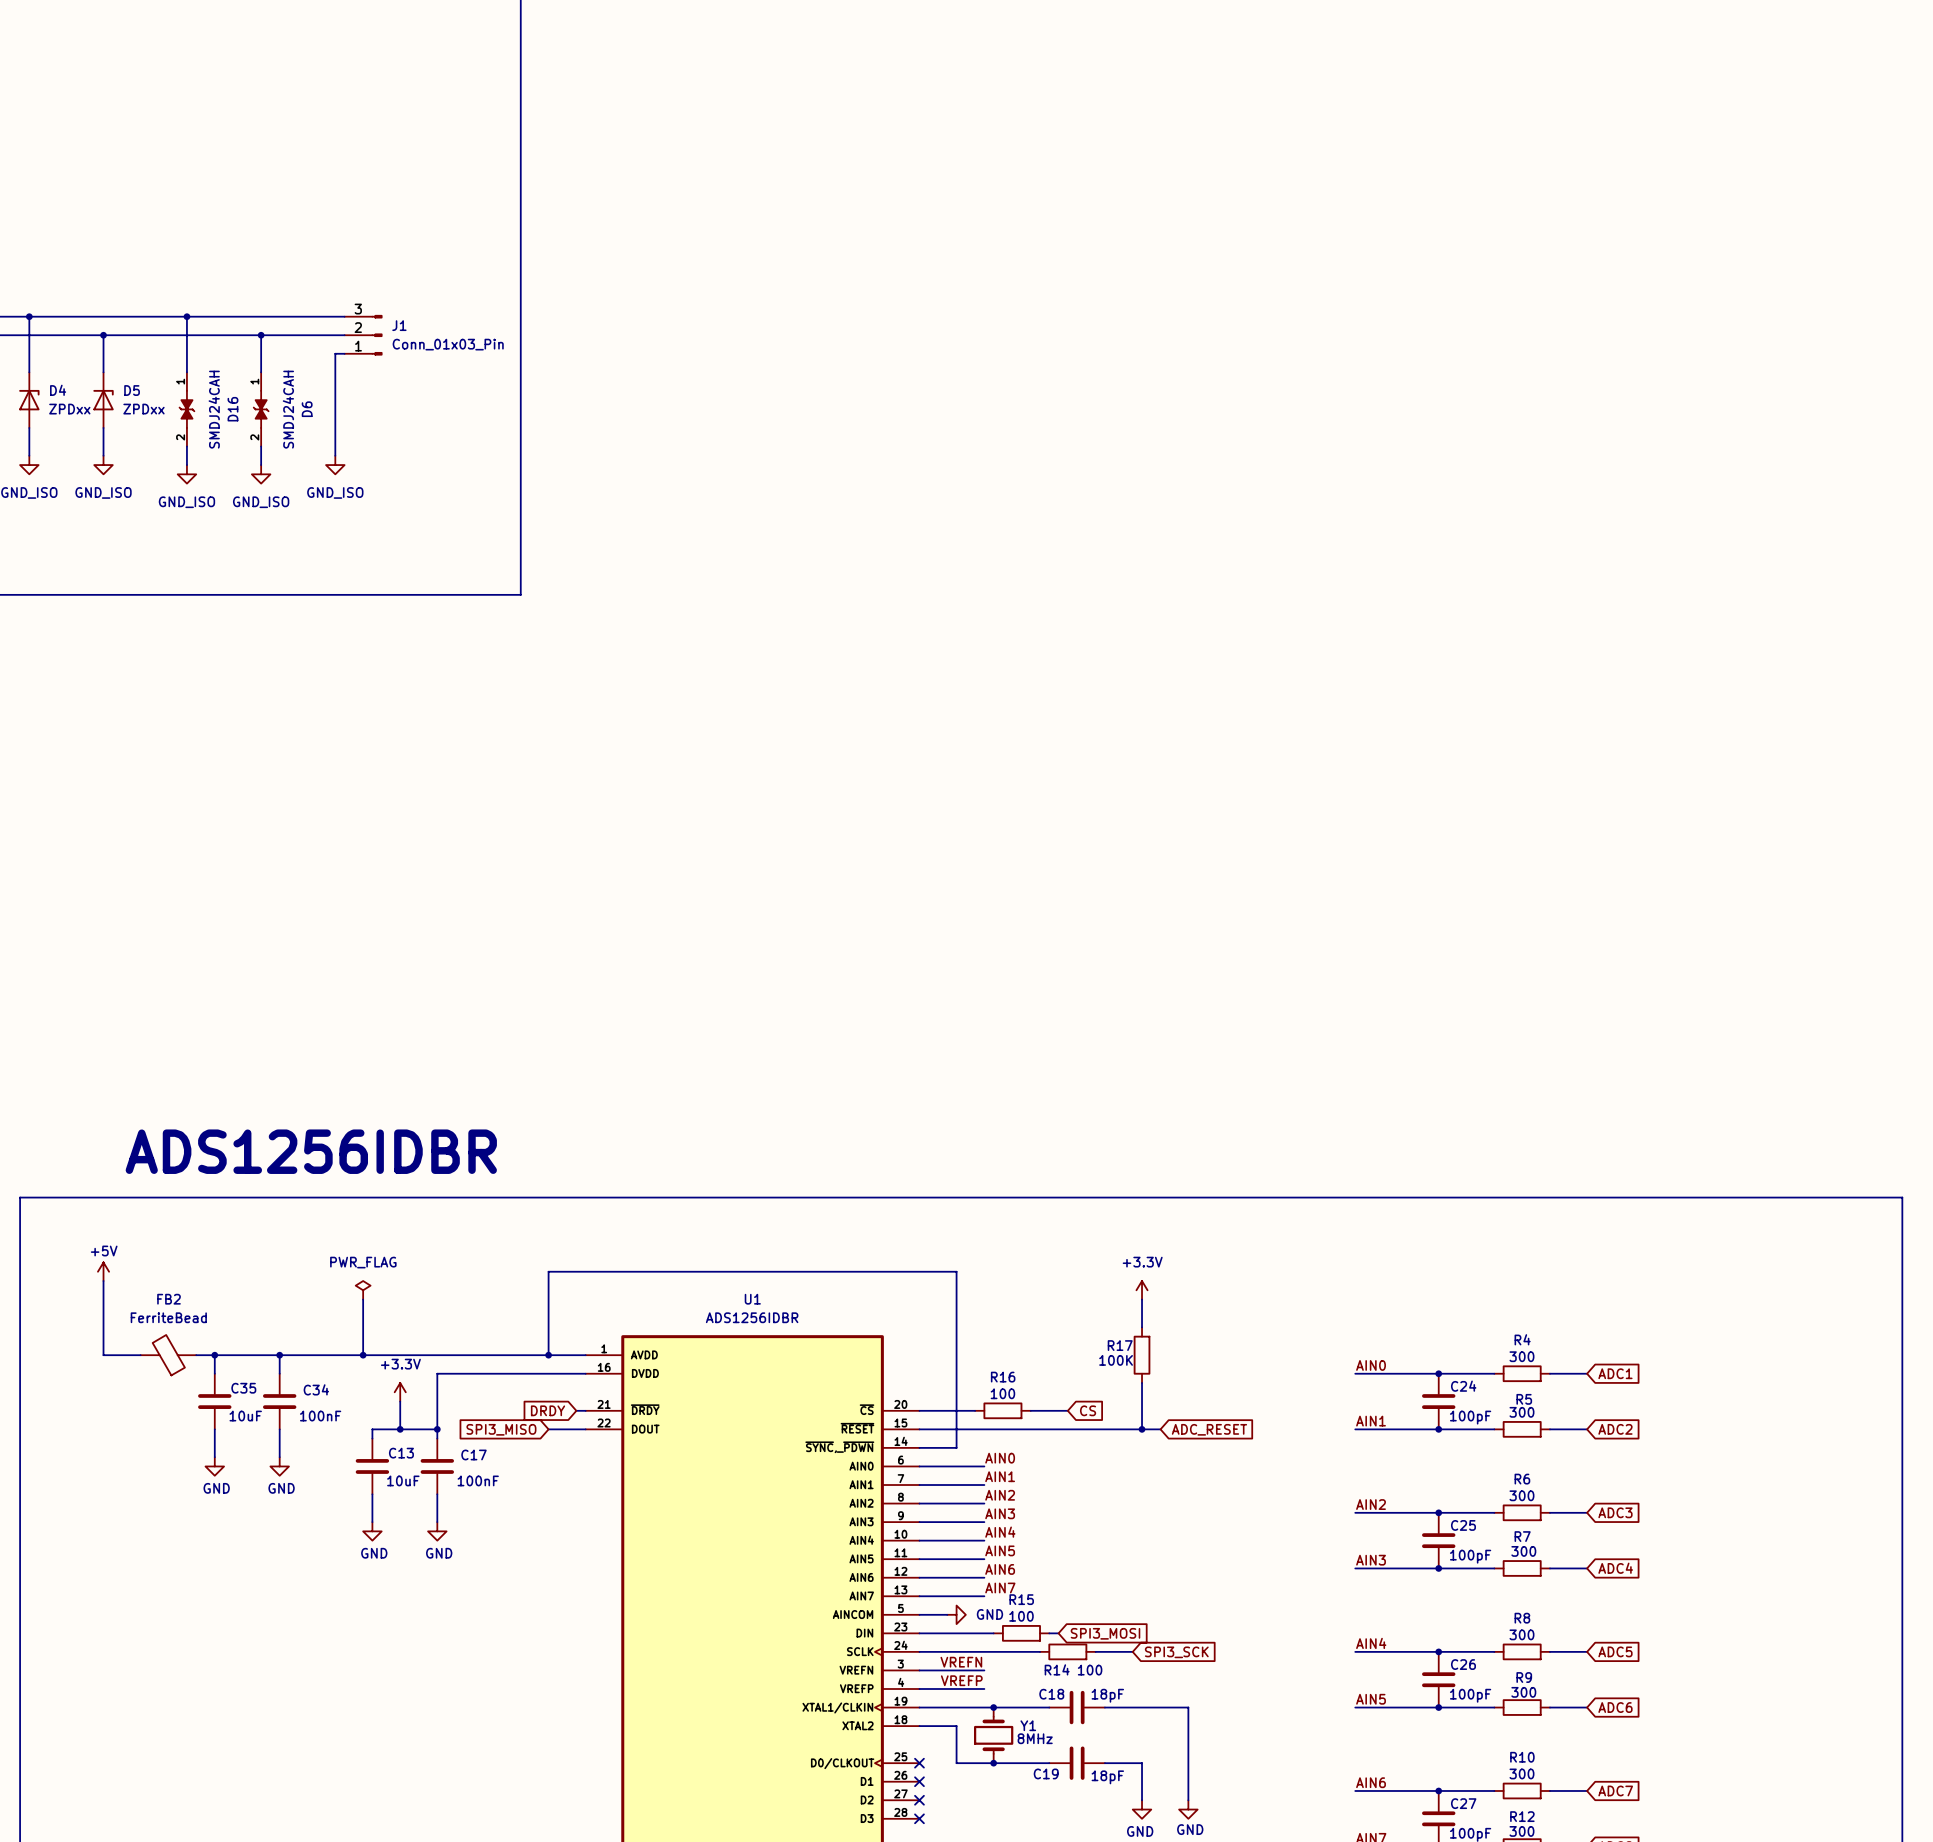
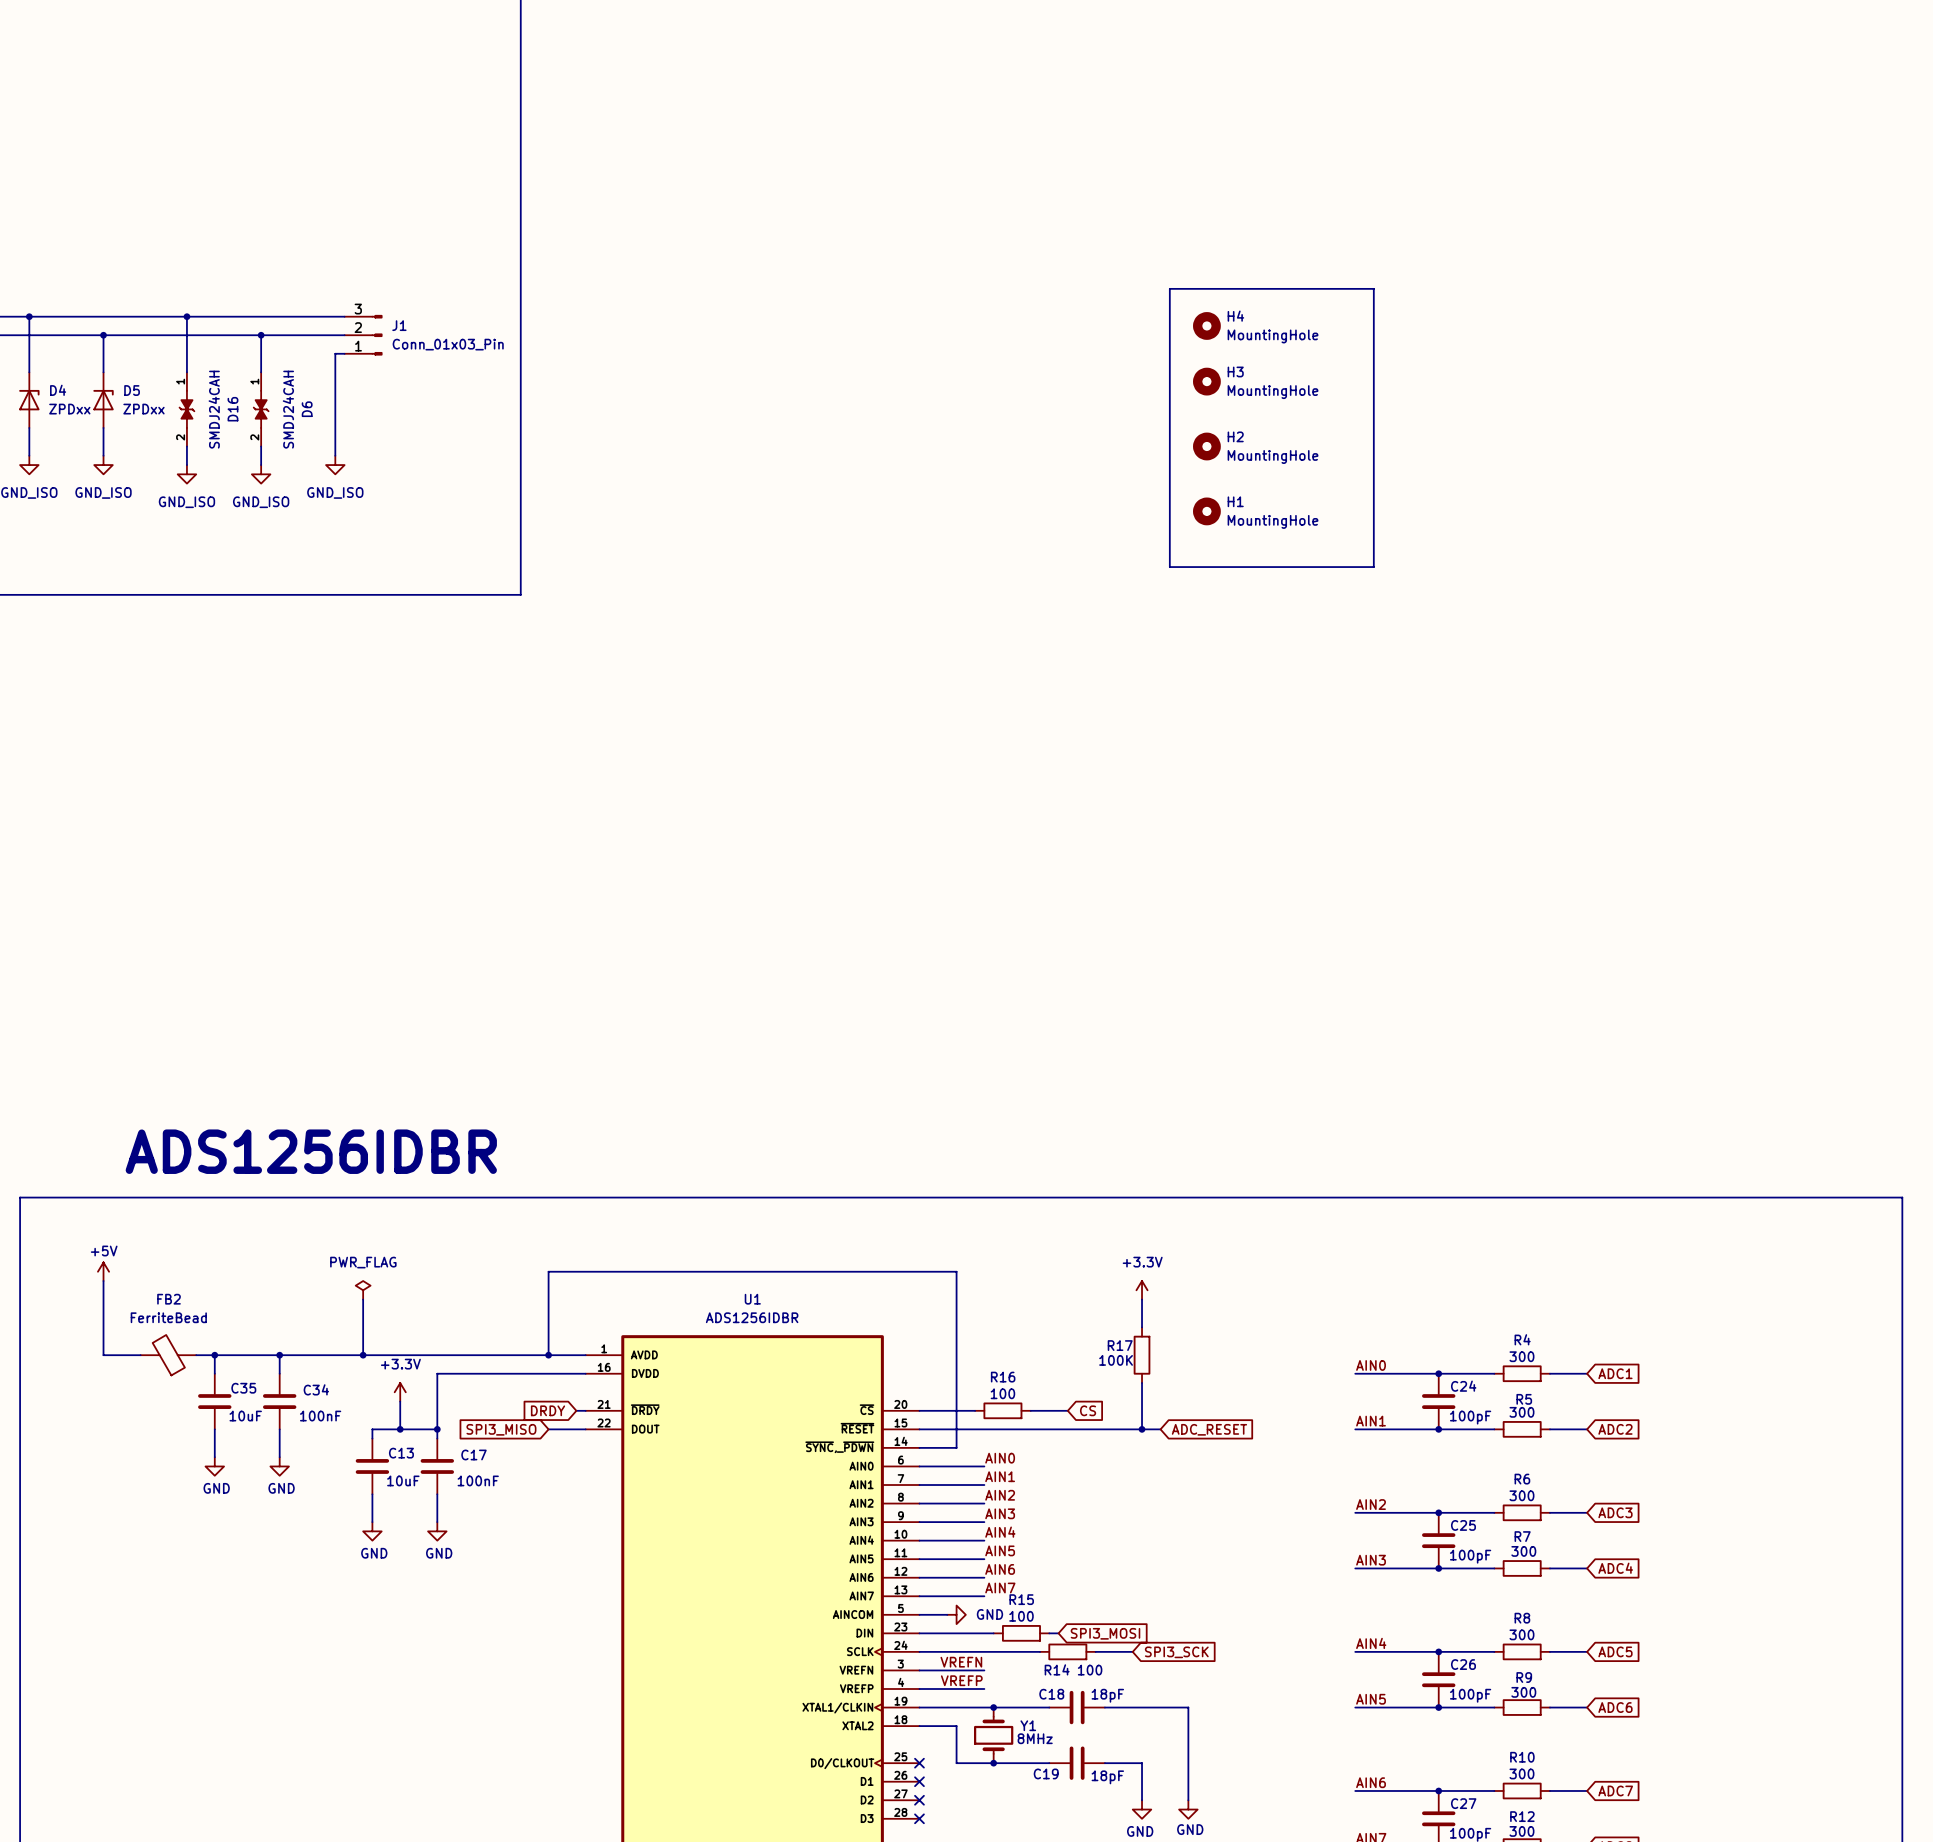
line: none -> (1169, 288) (1373, 288) (1373, 567) (1169, 567) (1169, 288)
H4: none -> MountingHole (1206, 325)
H3: none -> MountingHole (1206, 381)
H2: none -> MountingHole (1206, 446)
H1: none -> MountingHole (1206, 511)

